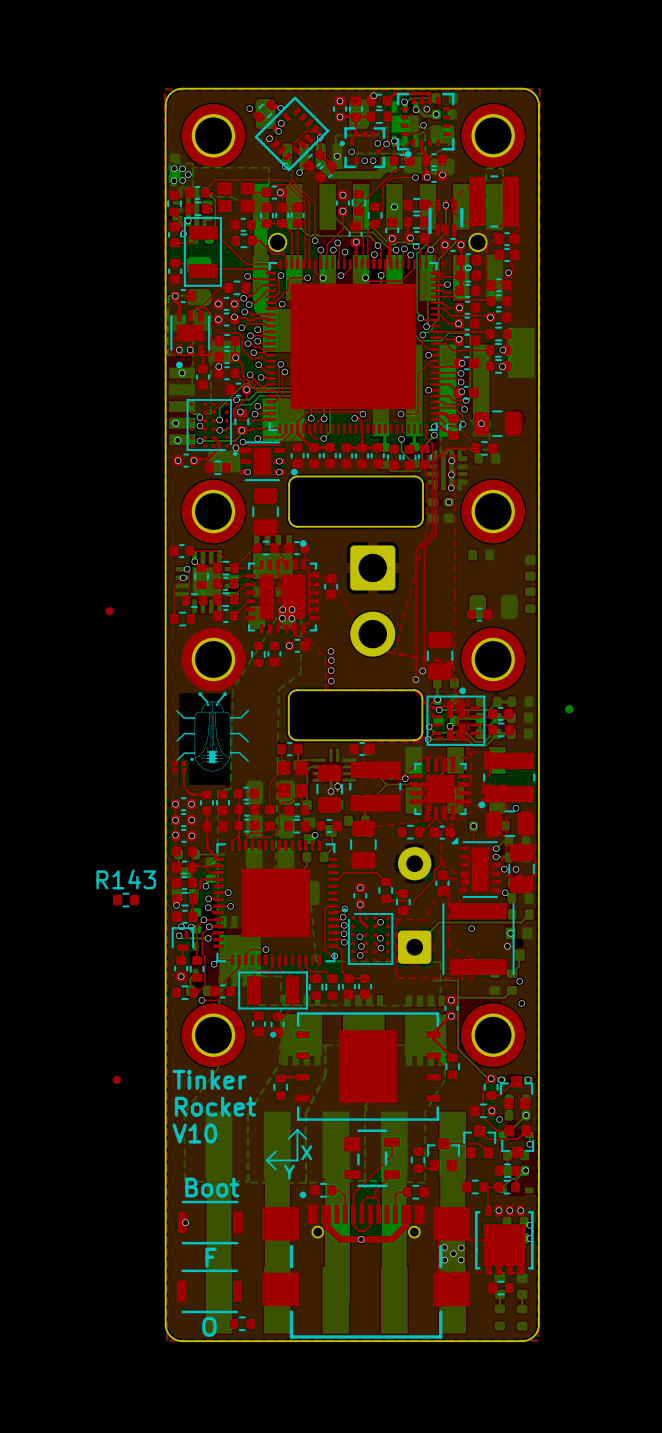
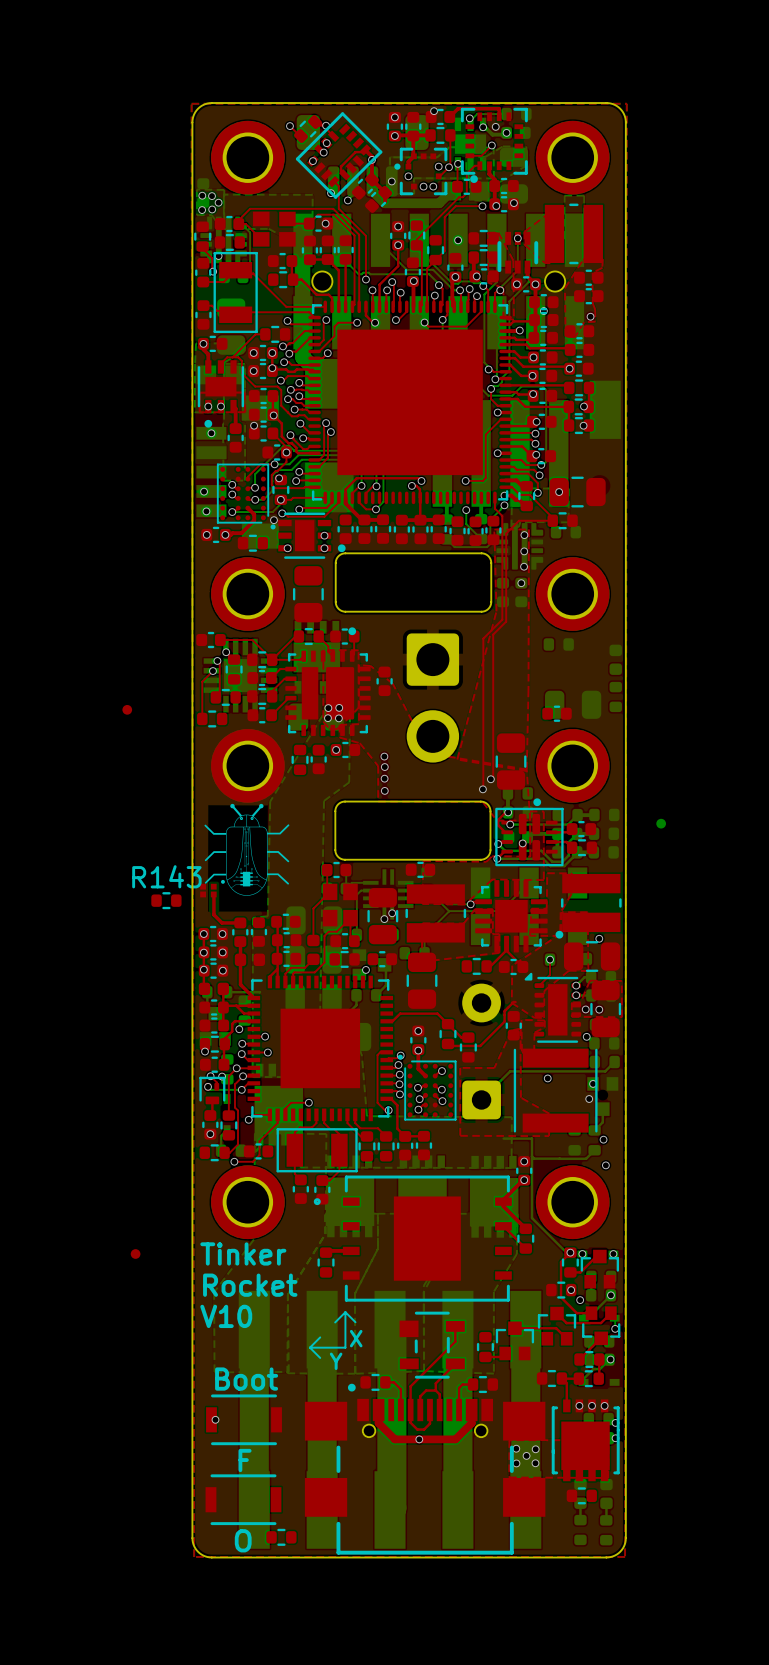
R143 position: (125, 900) -> (166, 900)

